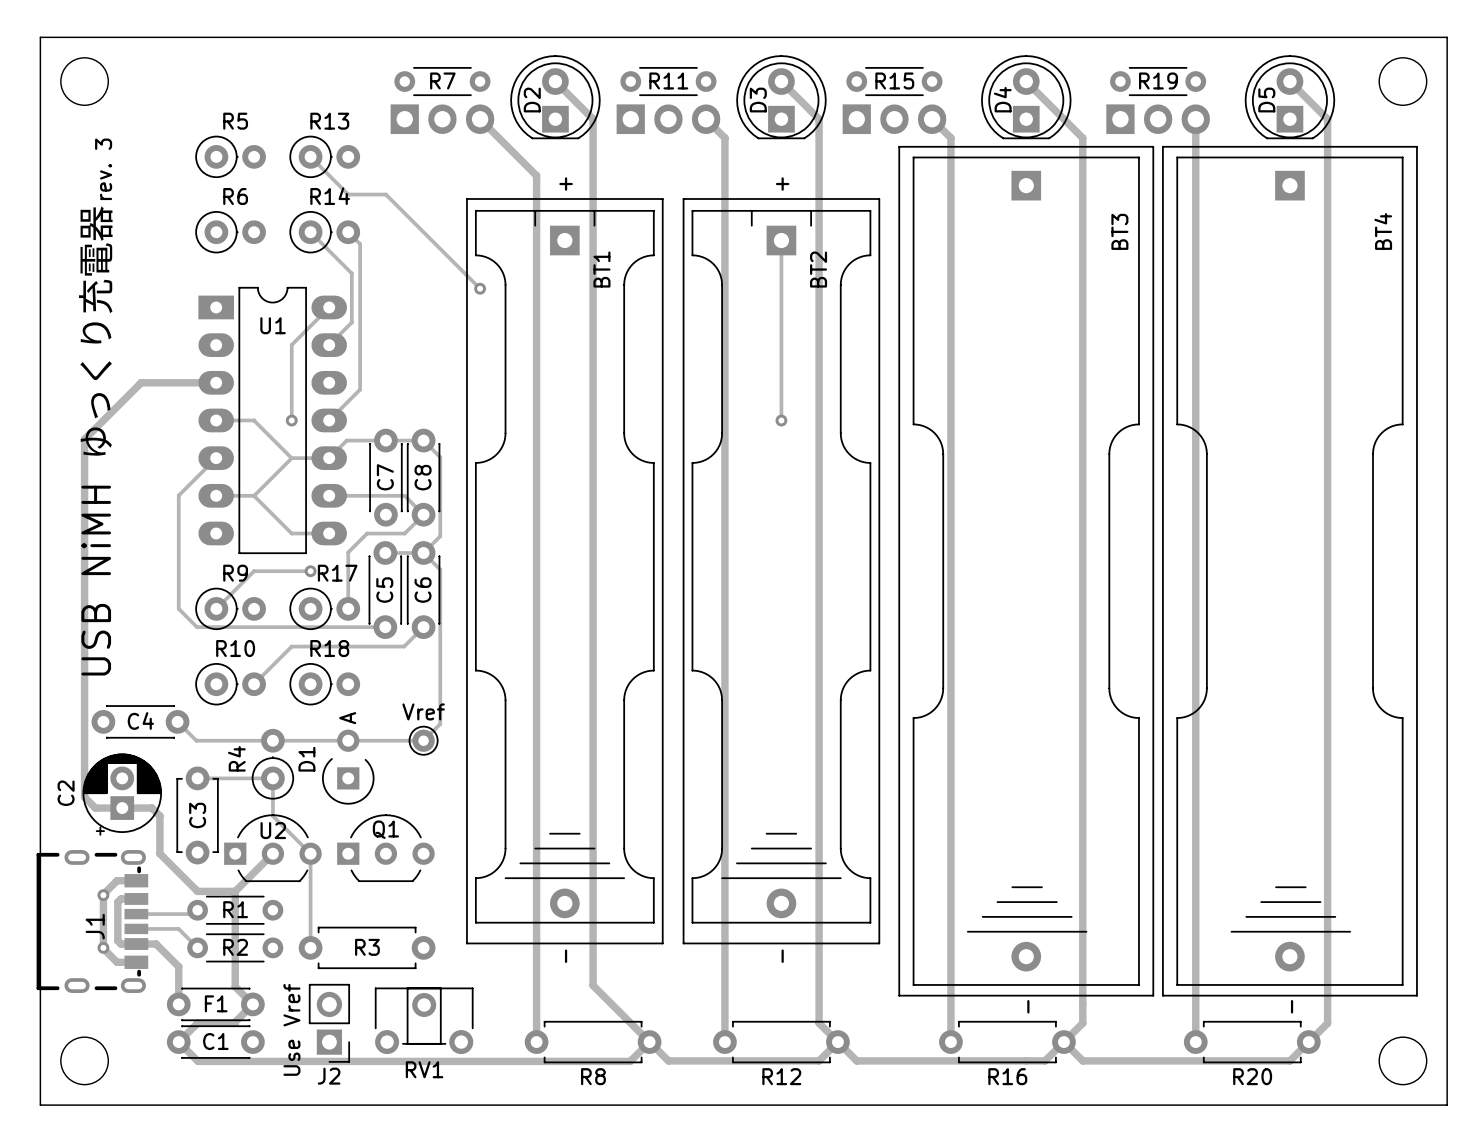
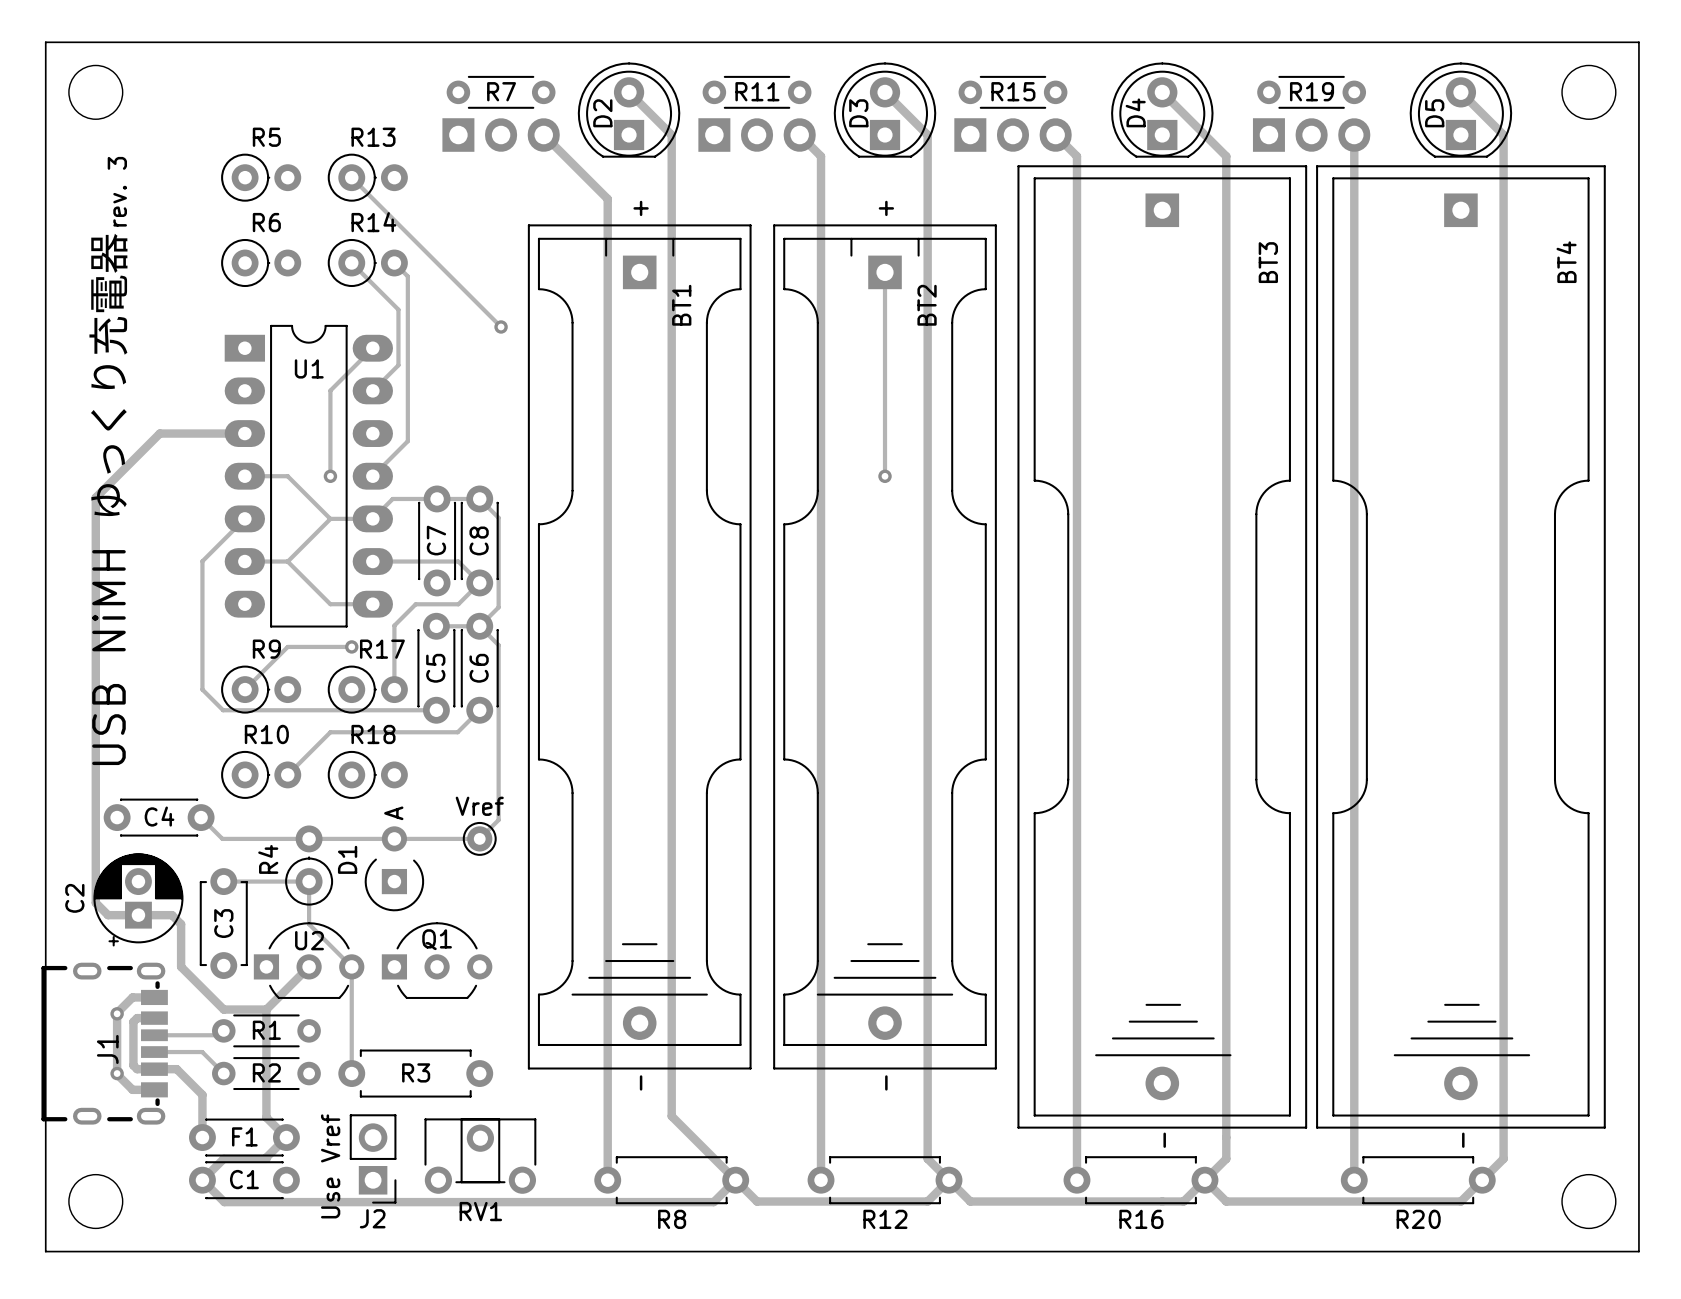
track: (348, 194) (385, 194) (480, 288) -> (394, 220) (501, 326)
via position: (480, 288) -> (501, 326)

